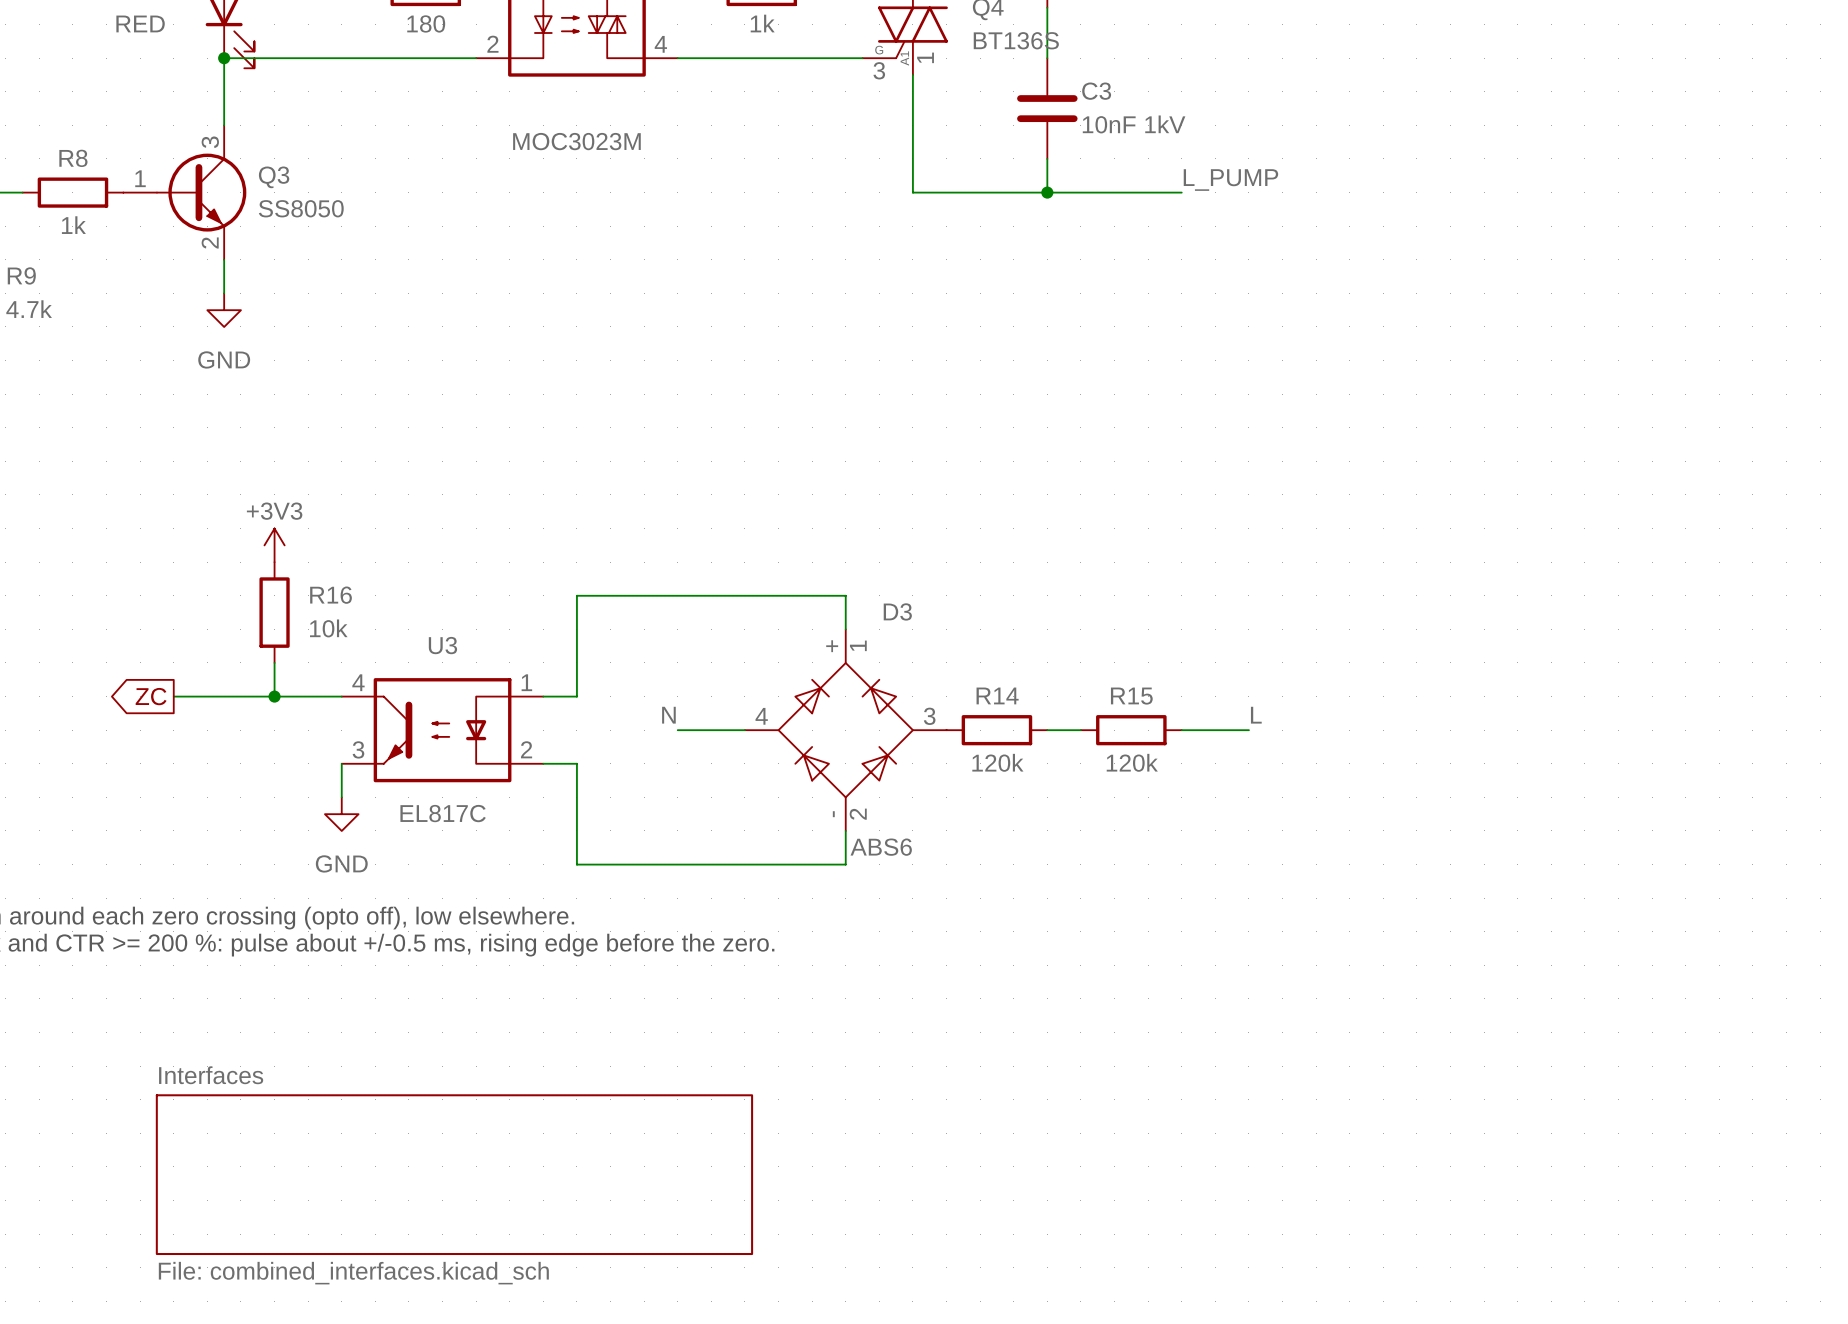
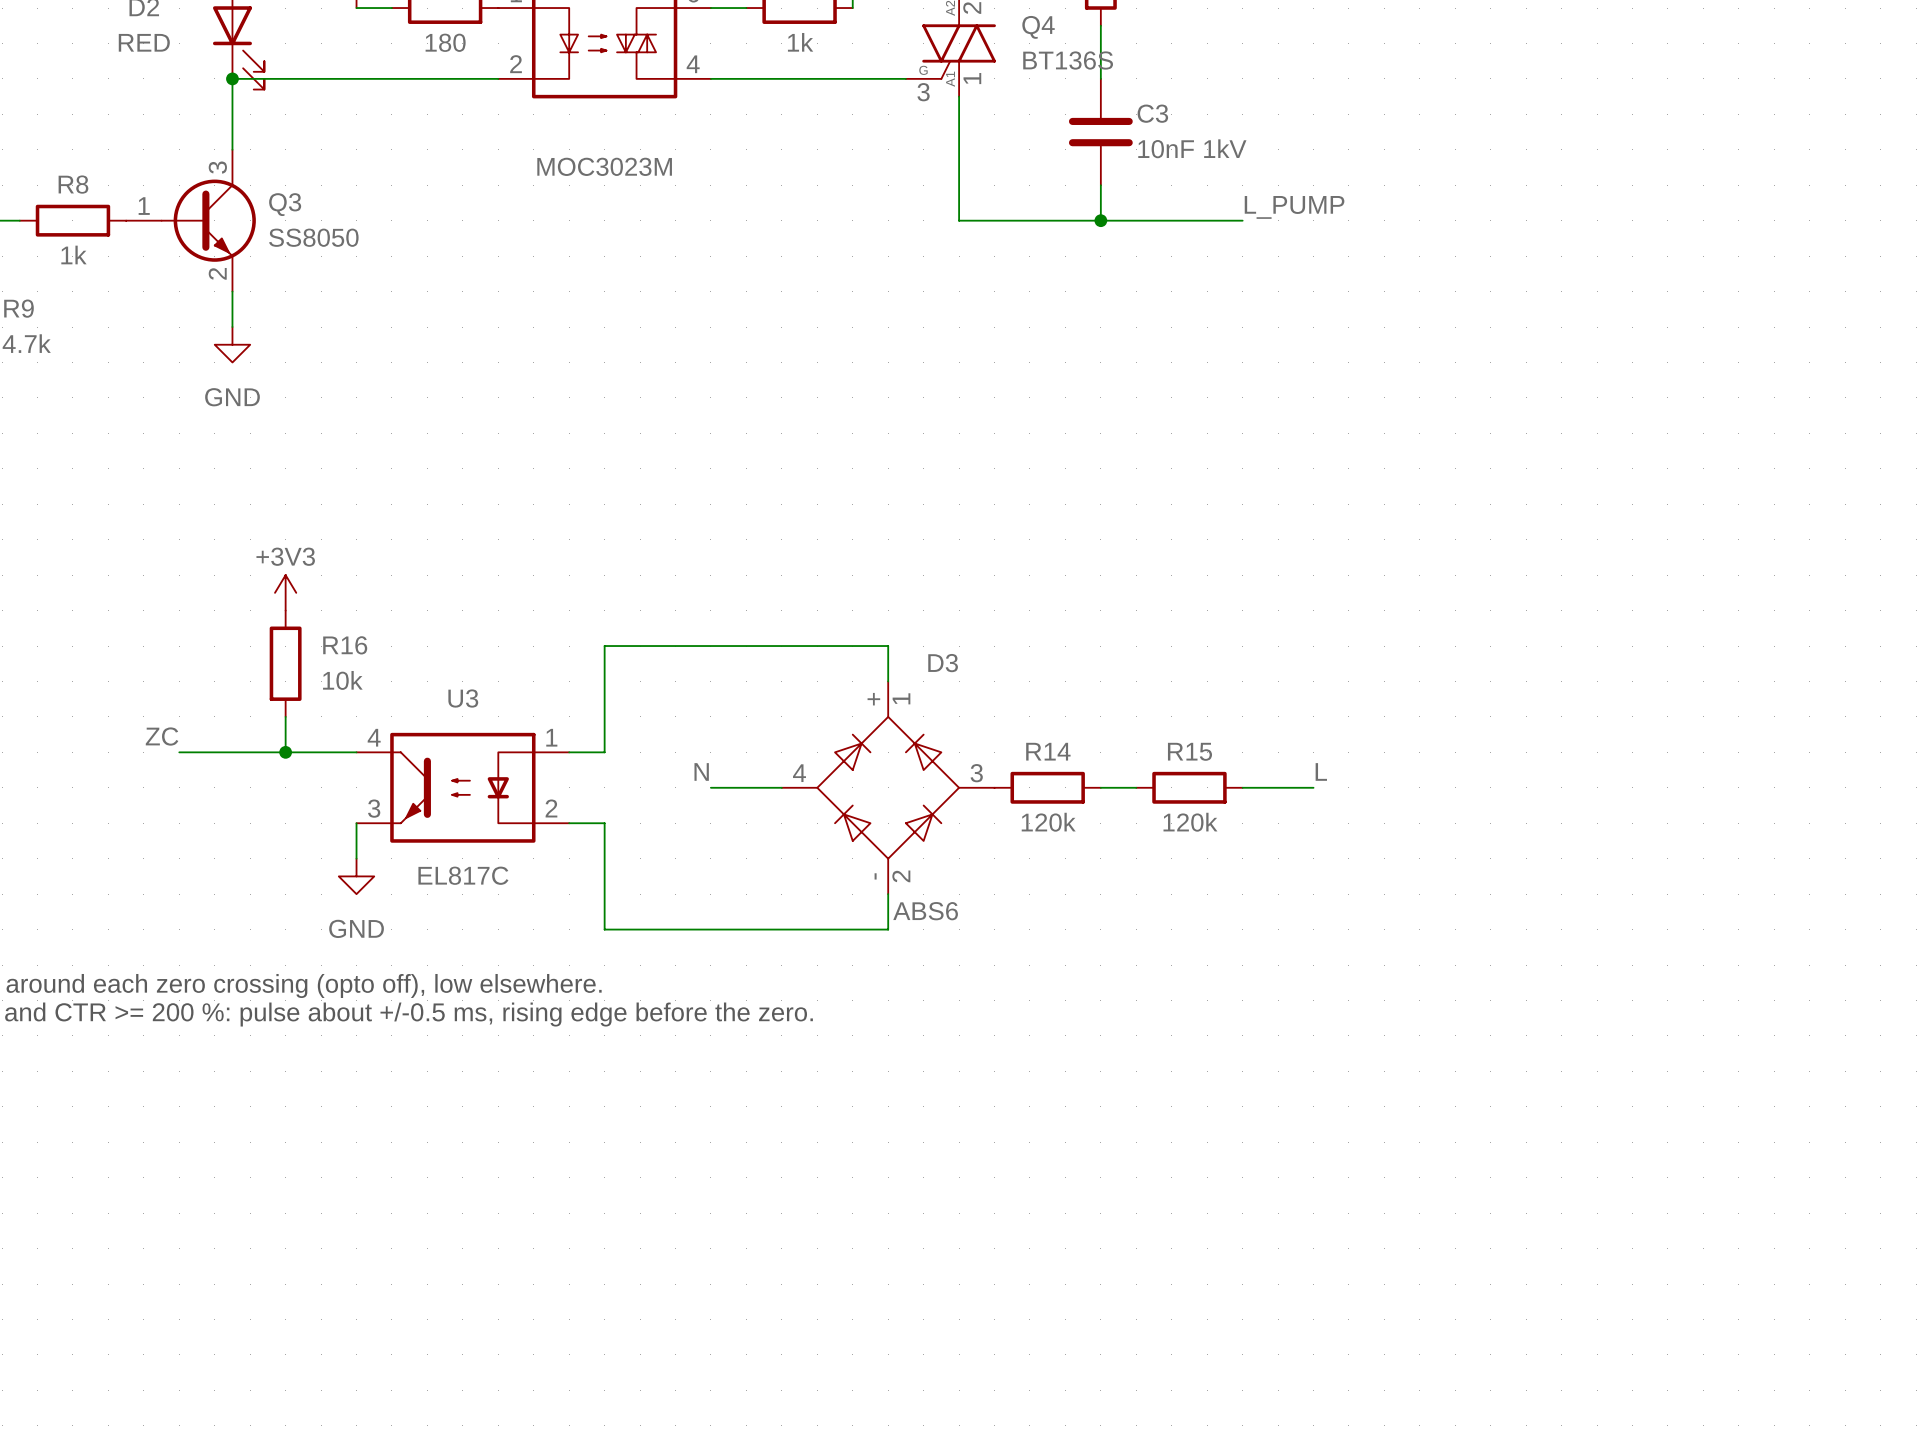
label: none -> ZC (162, 736)
global label: ZC (151, 696) -> none
sheet Interfaces: File: combined_interfaces.kicad_sch (454, 1174) -> none

